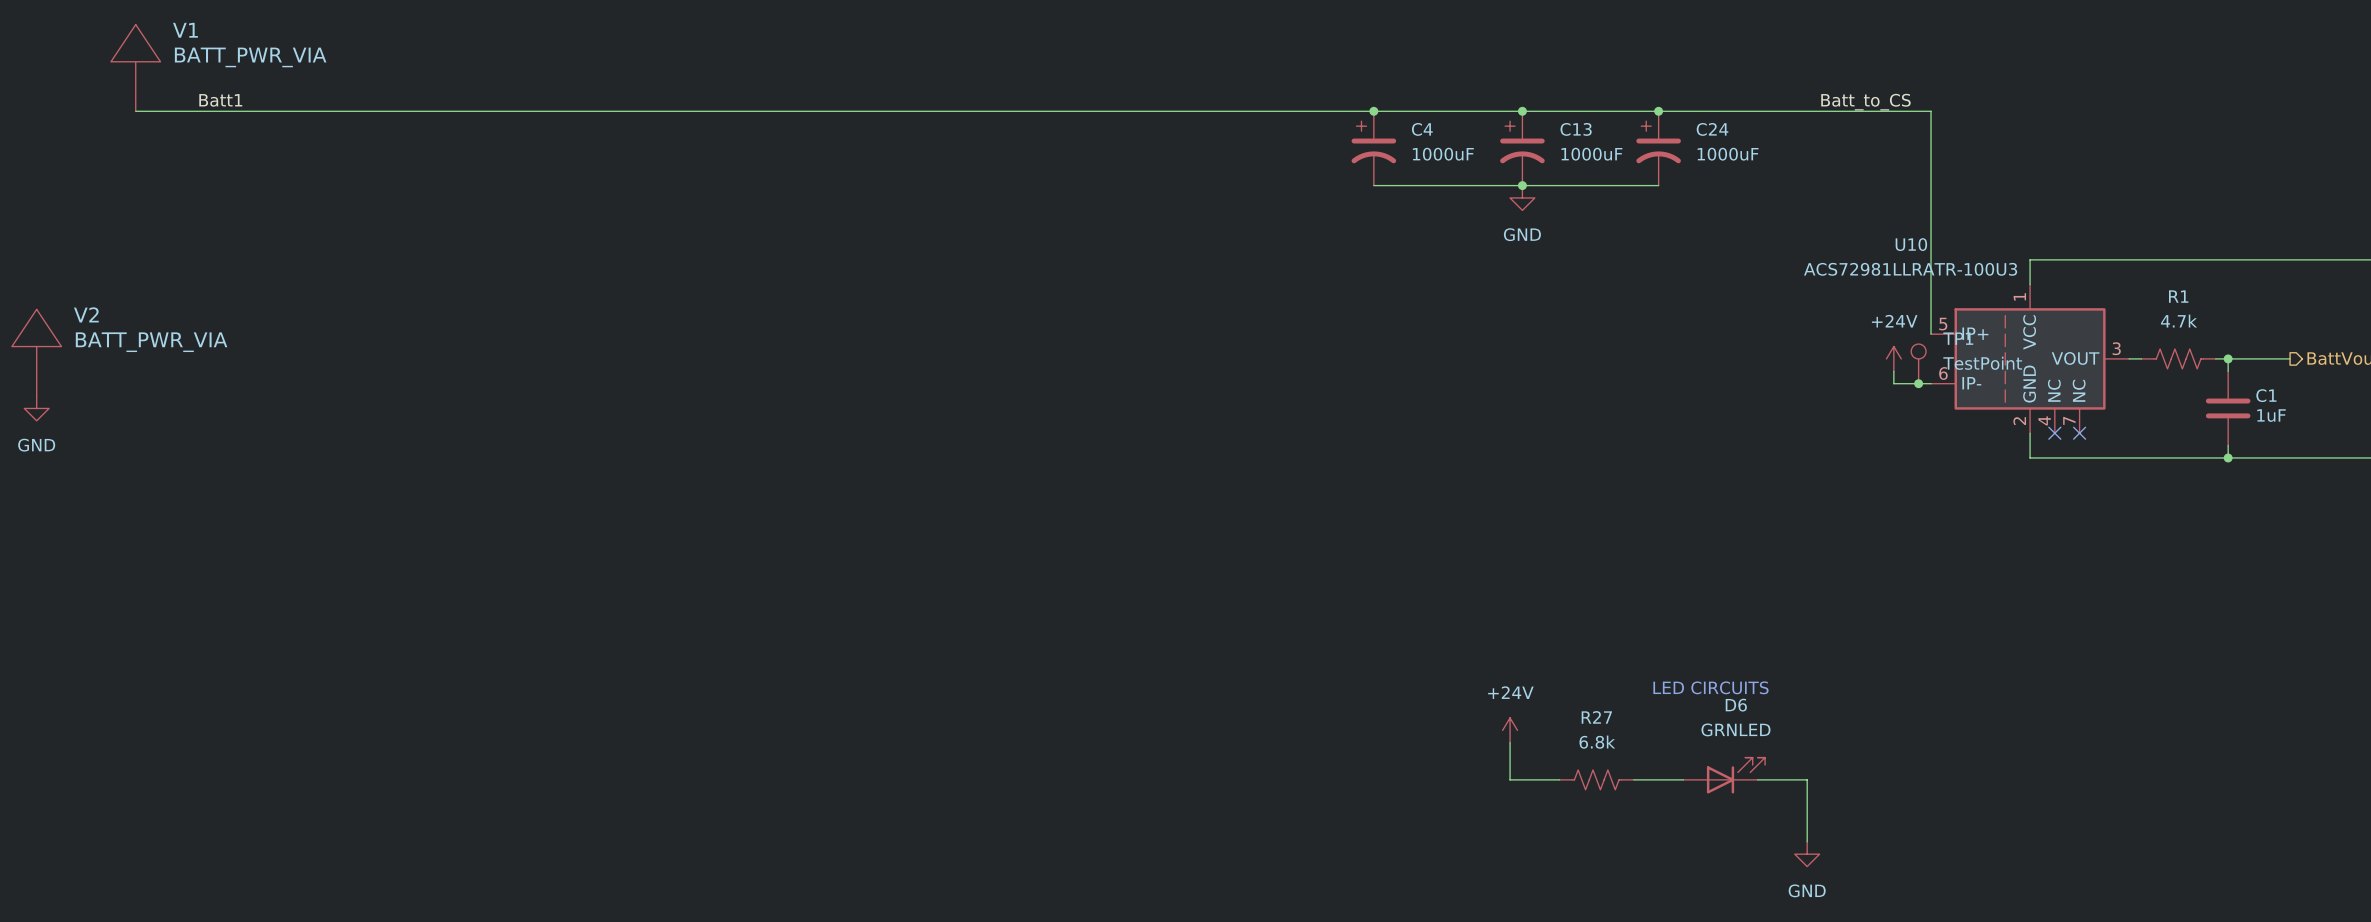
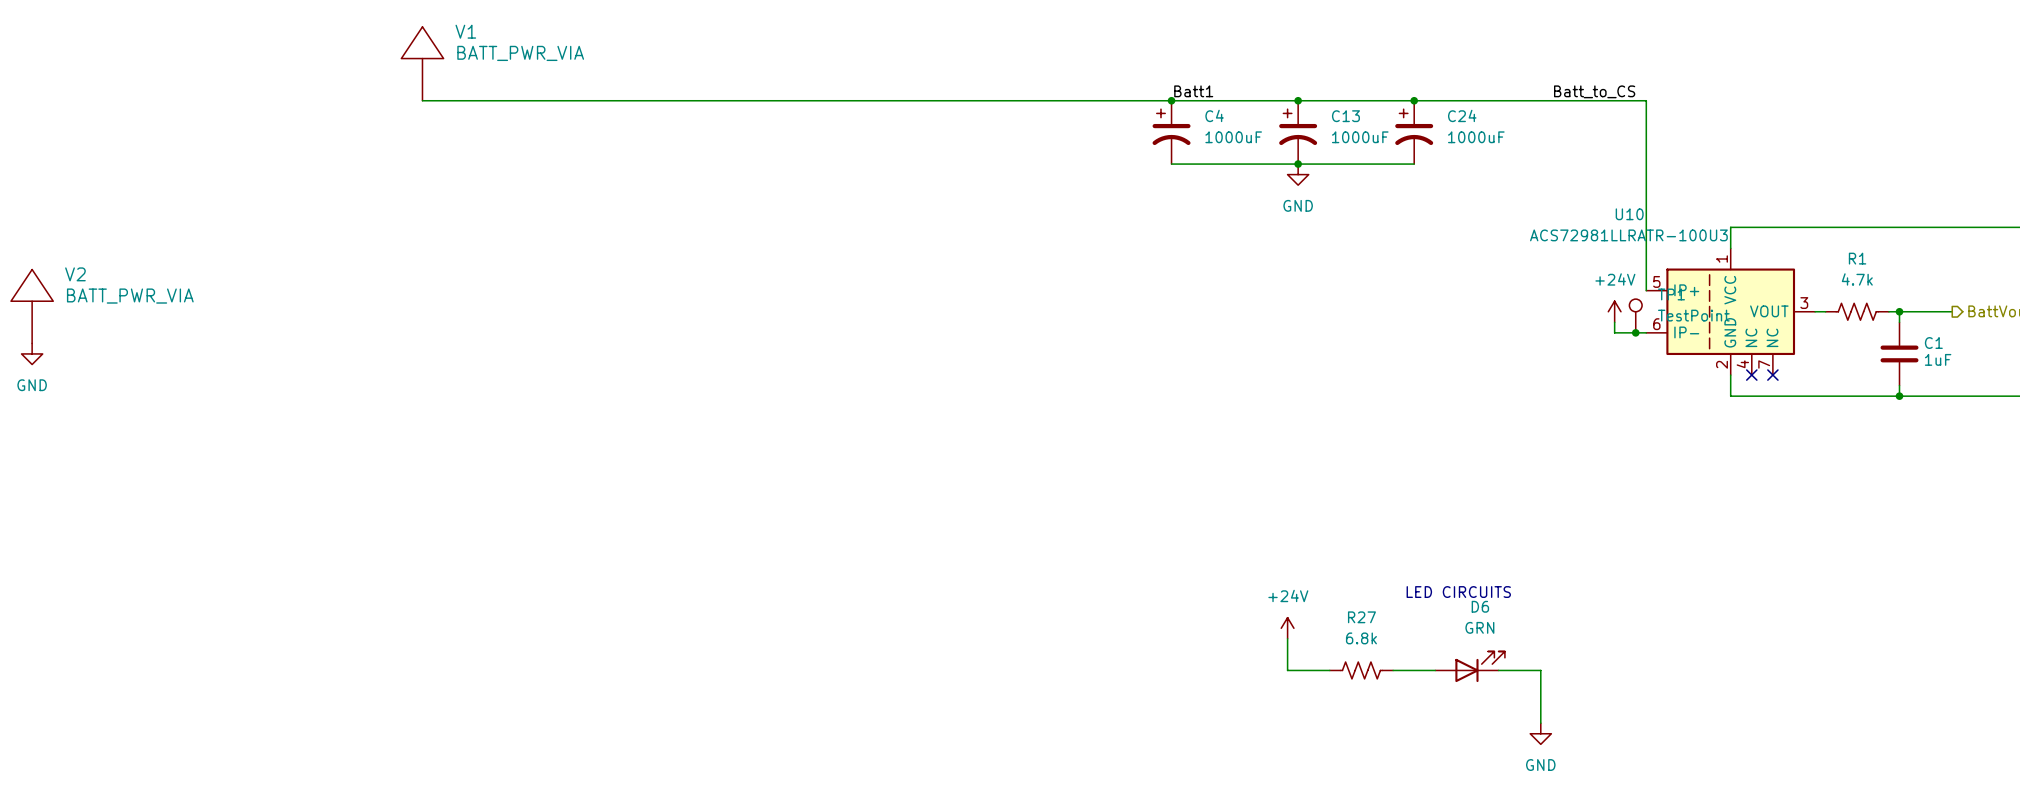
V1 position: (135, 67) -> (422, 63)
label: Batt1 (220, 100) -> none
label: none -> Batt1 (1193, 91)
wire: (135, 111) (494, 111) -> none
D6 value: GRNLED (1735, 729) -> GRN (1479, 627)

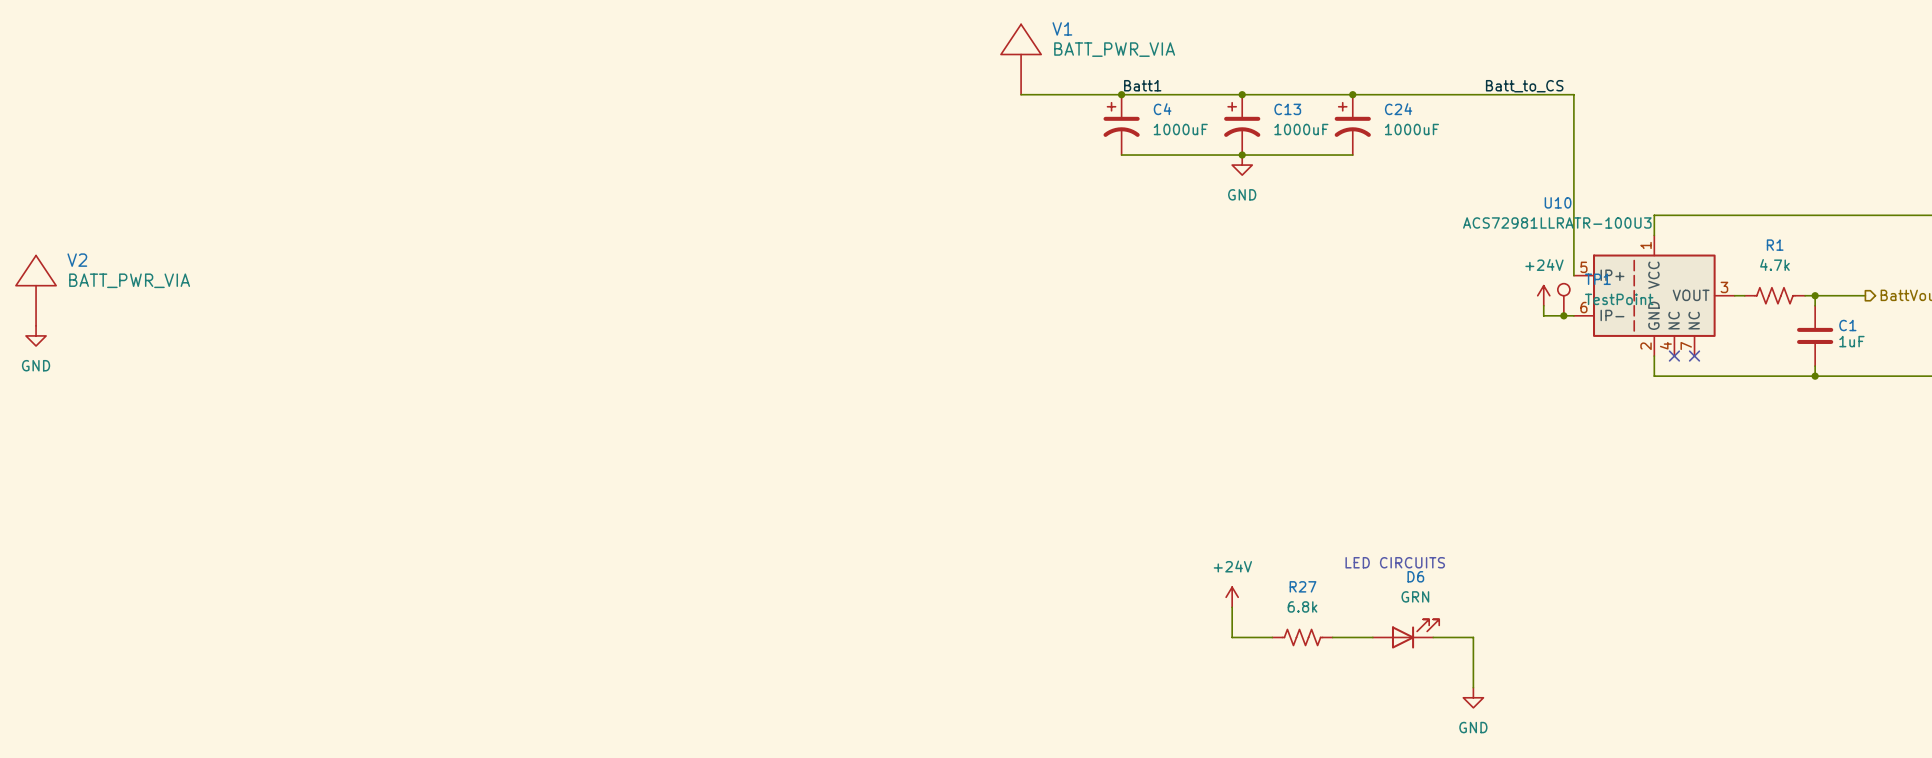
V1 position: (422, 63) -> (1021, 59)
wire: (422, 100) (1066, 100) -> none

